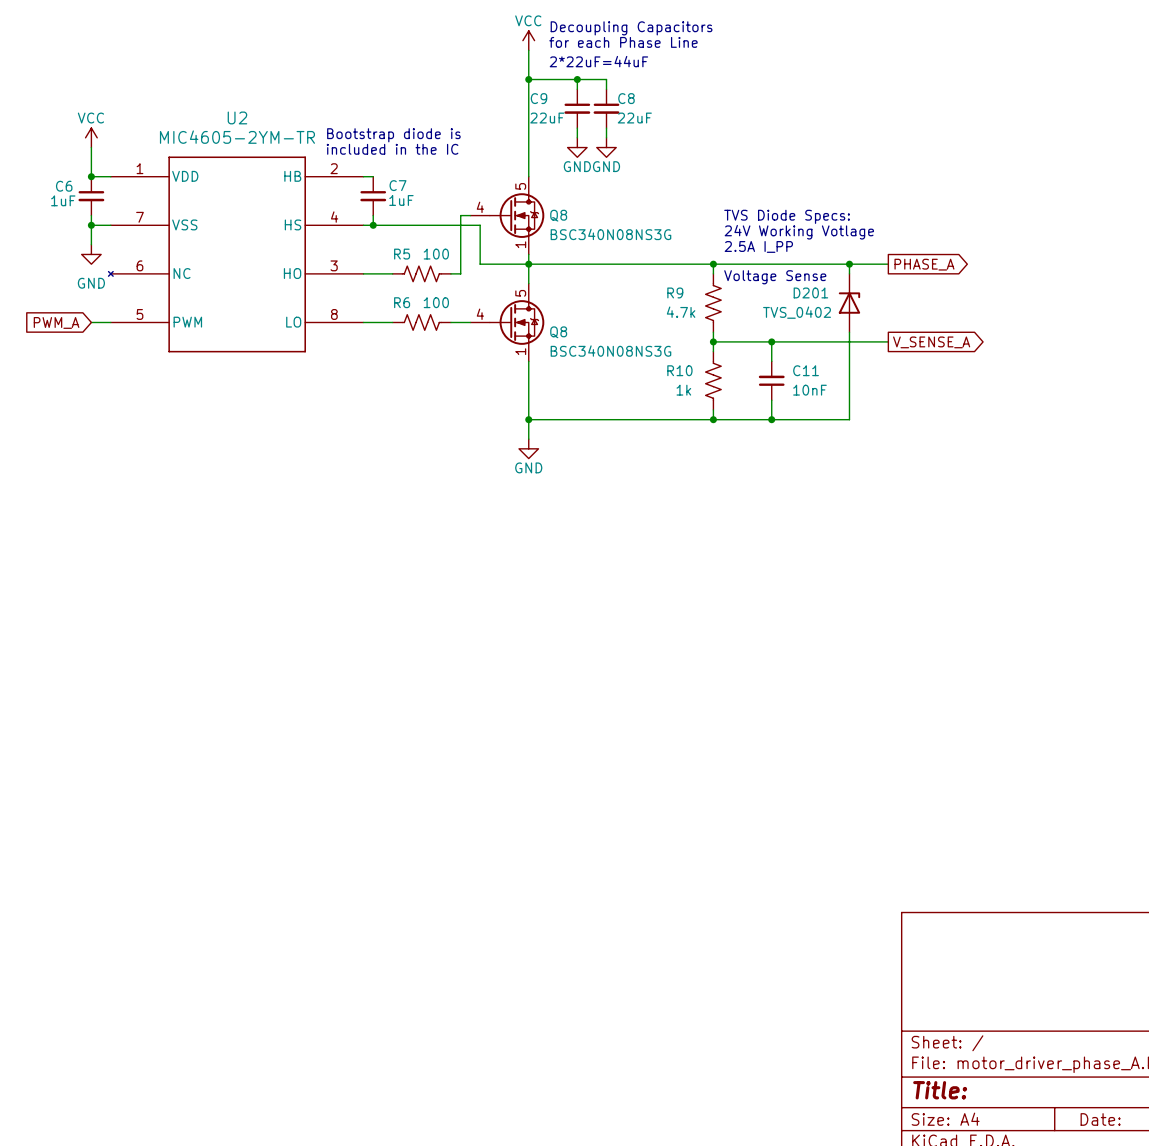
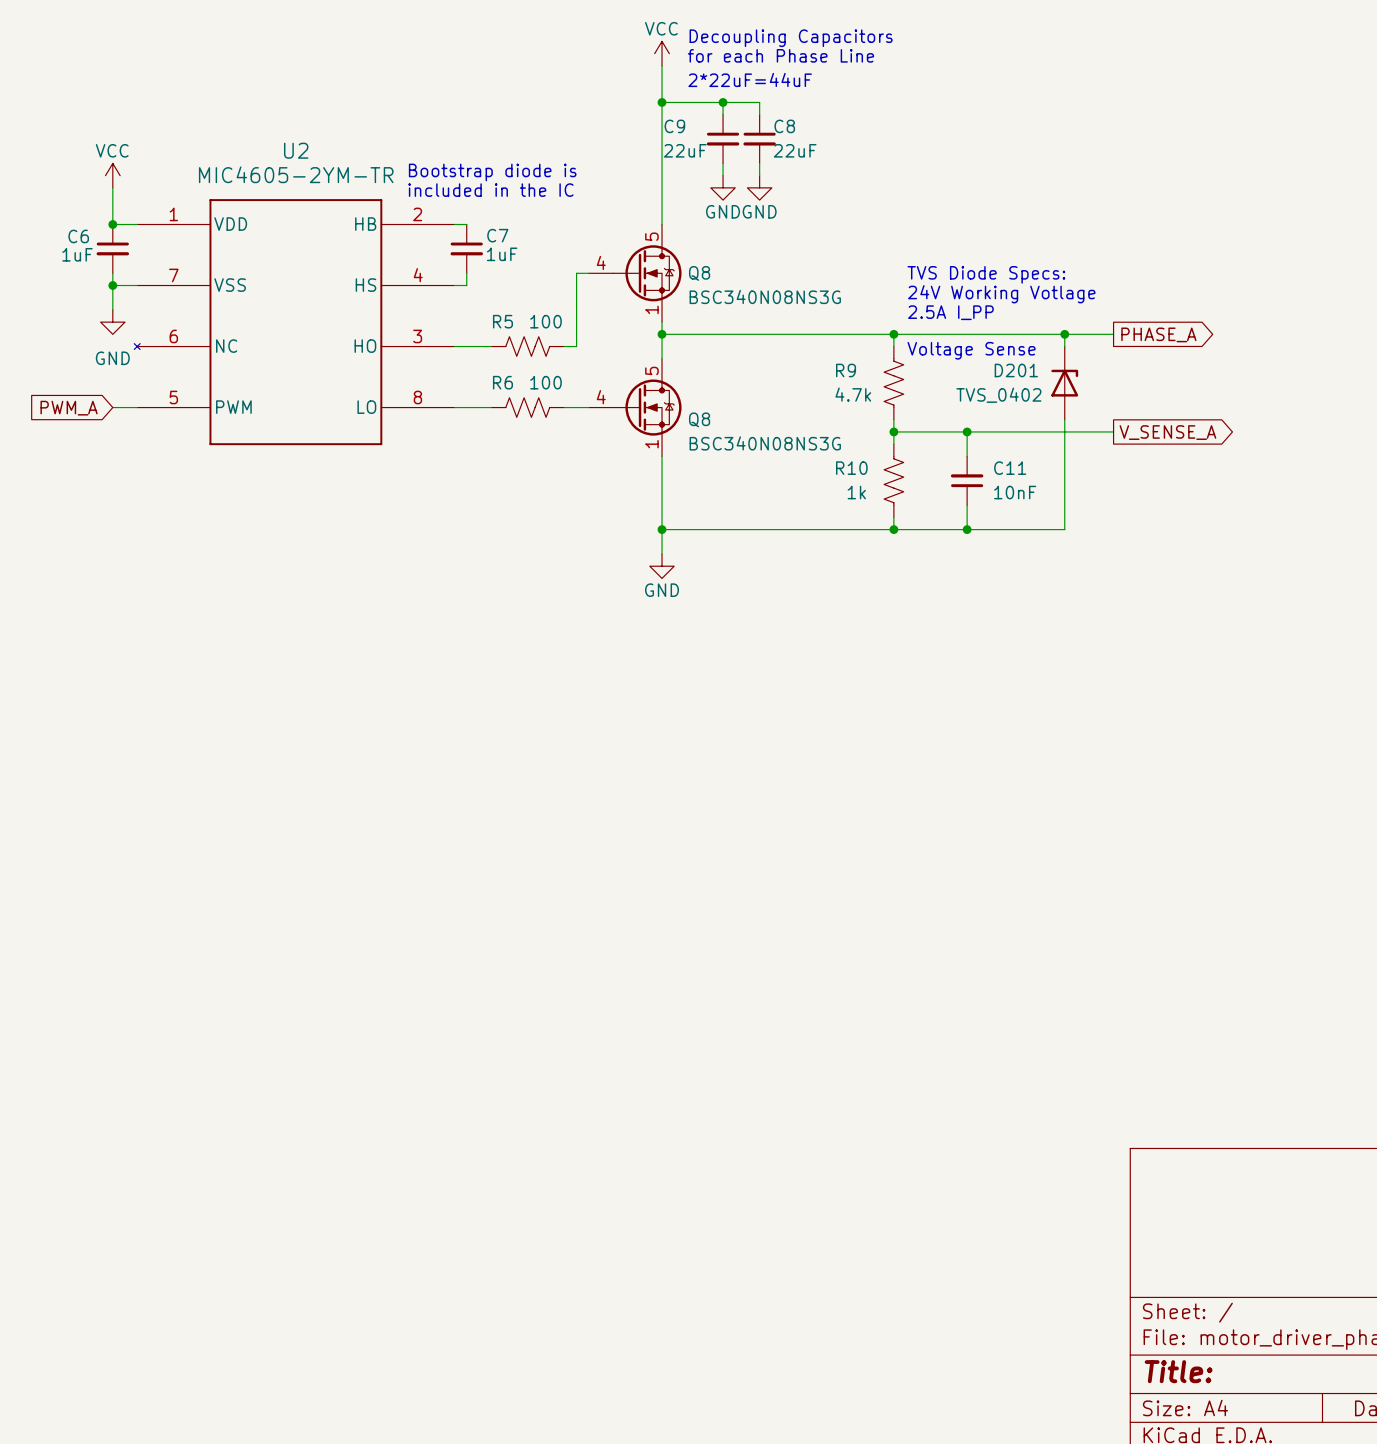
wire: (373, 225) (480, 225) (480, 264) (528, 264) -> none
junction: (373, 225) -> none

